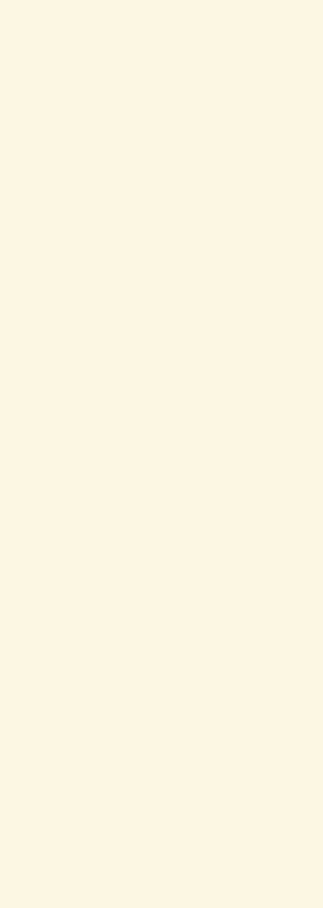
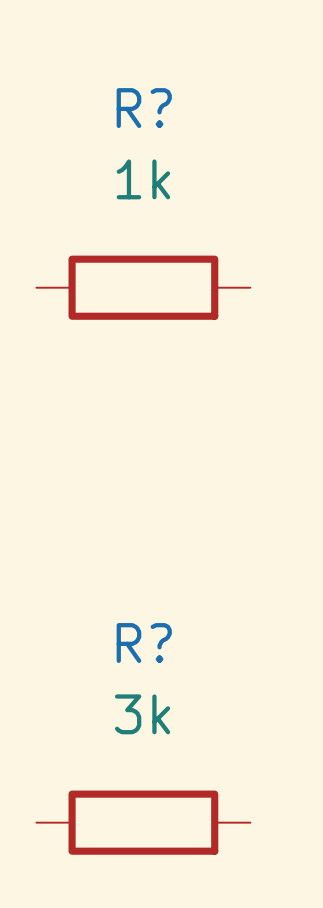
R?: none -> 1k (143, 287)
R?: none -> 3k (143, 822)

